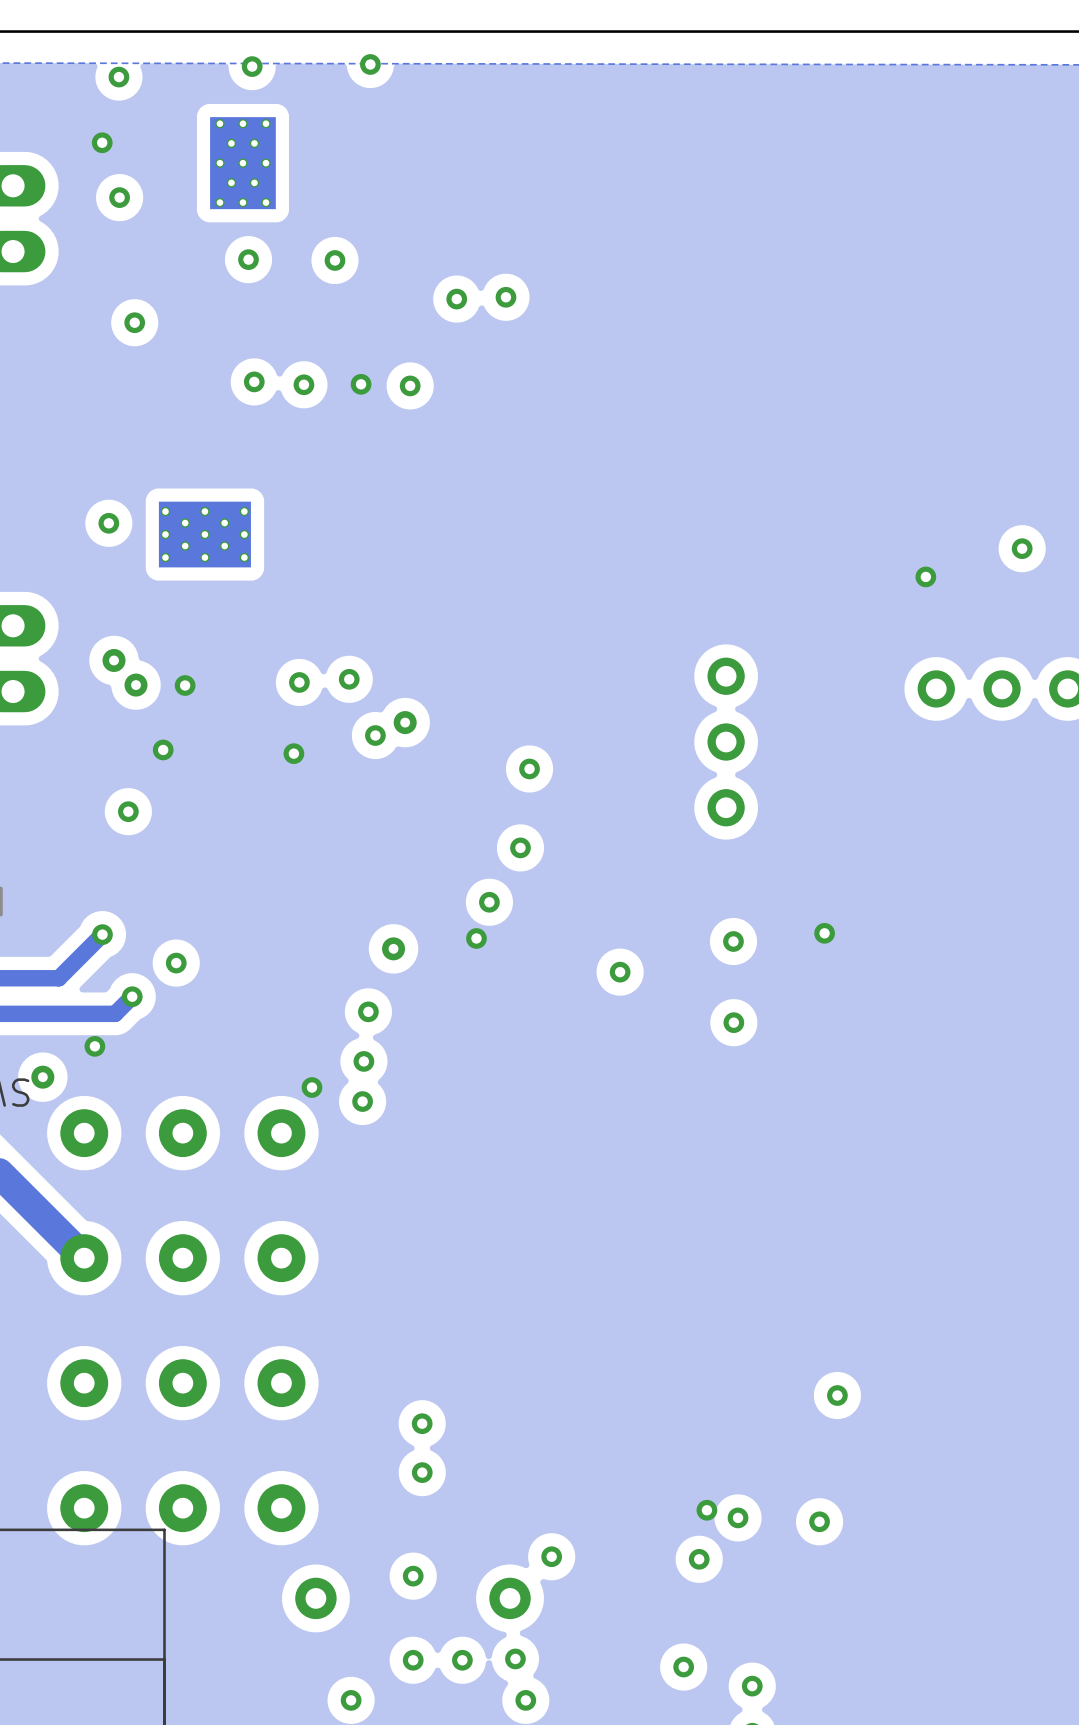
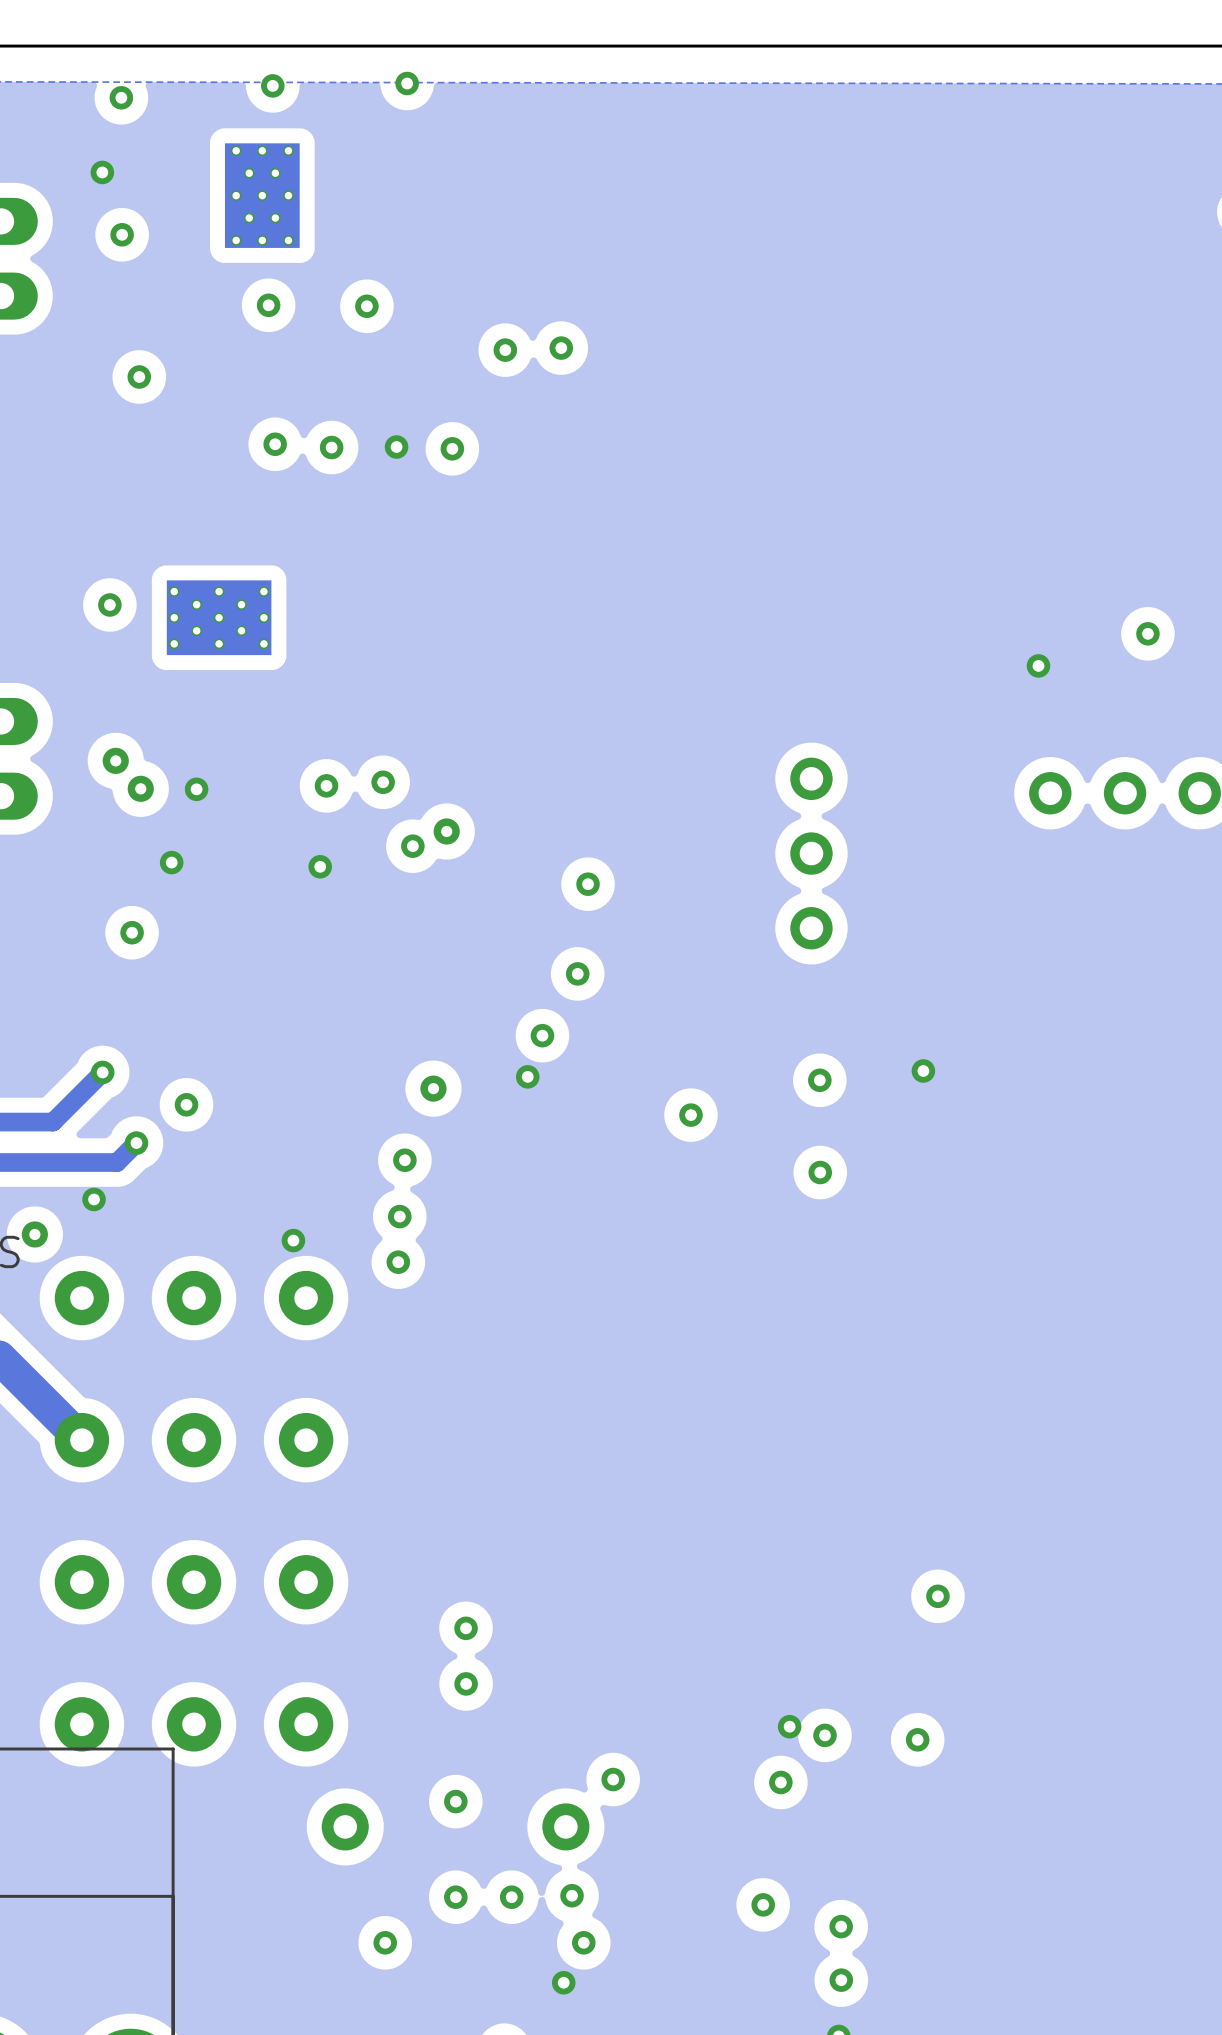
via position: (312, 1087) -> (293, 1240)

